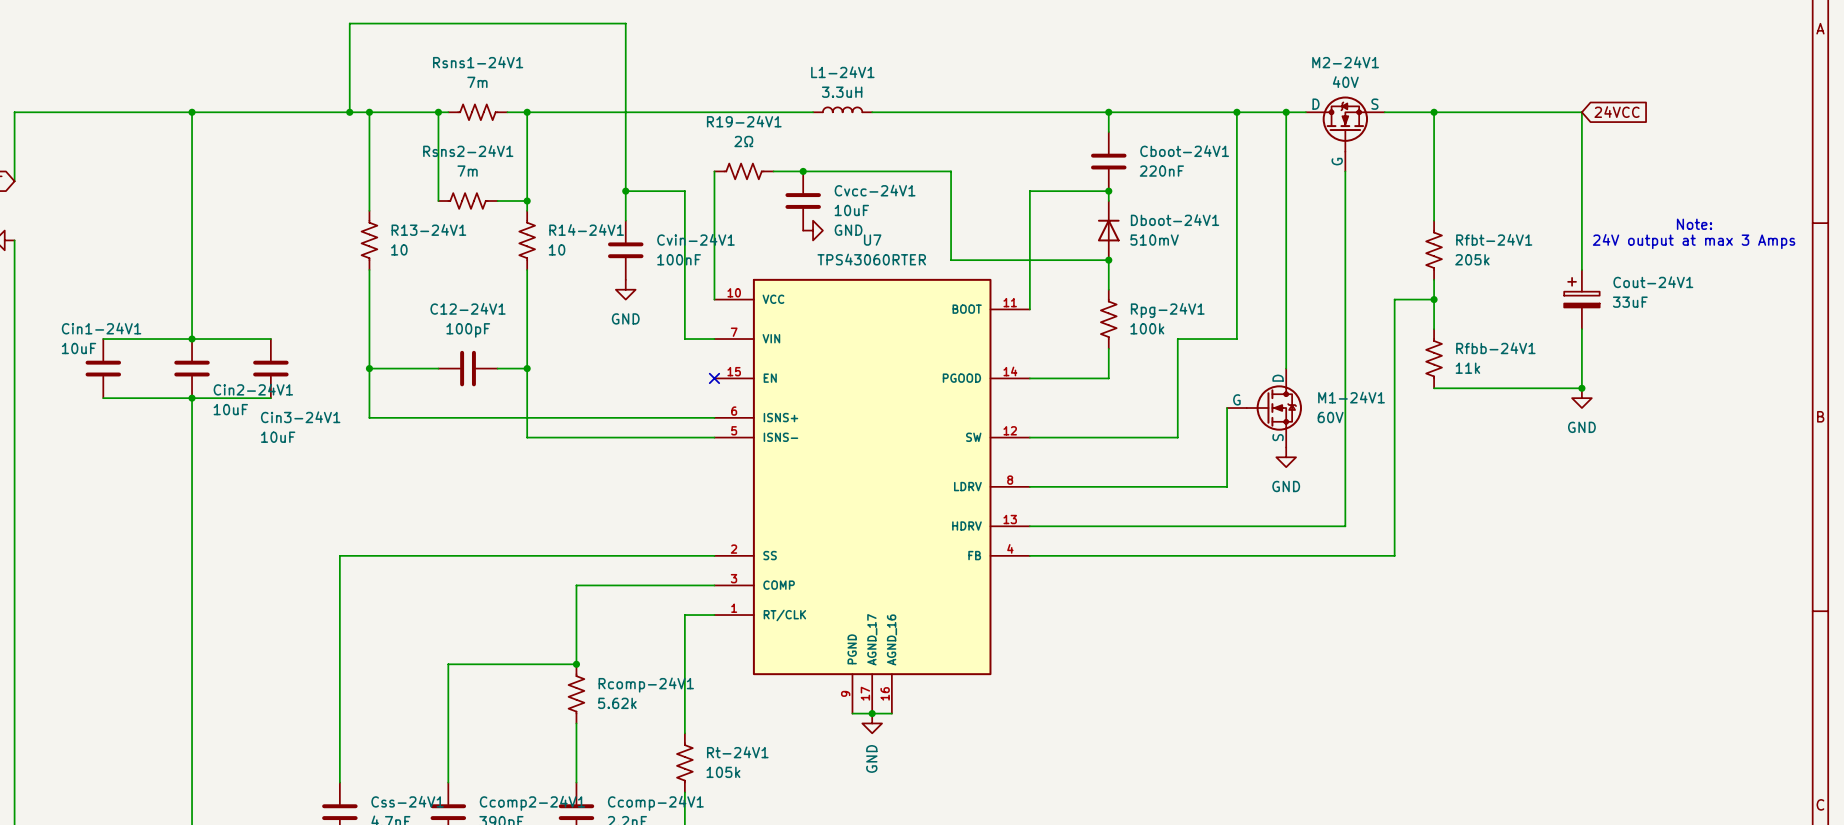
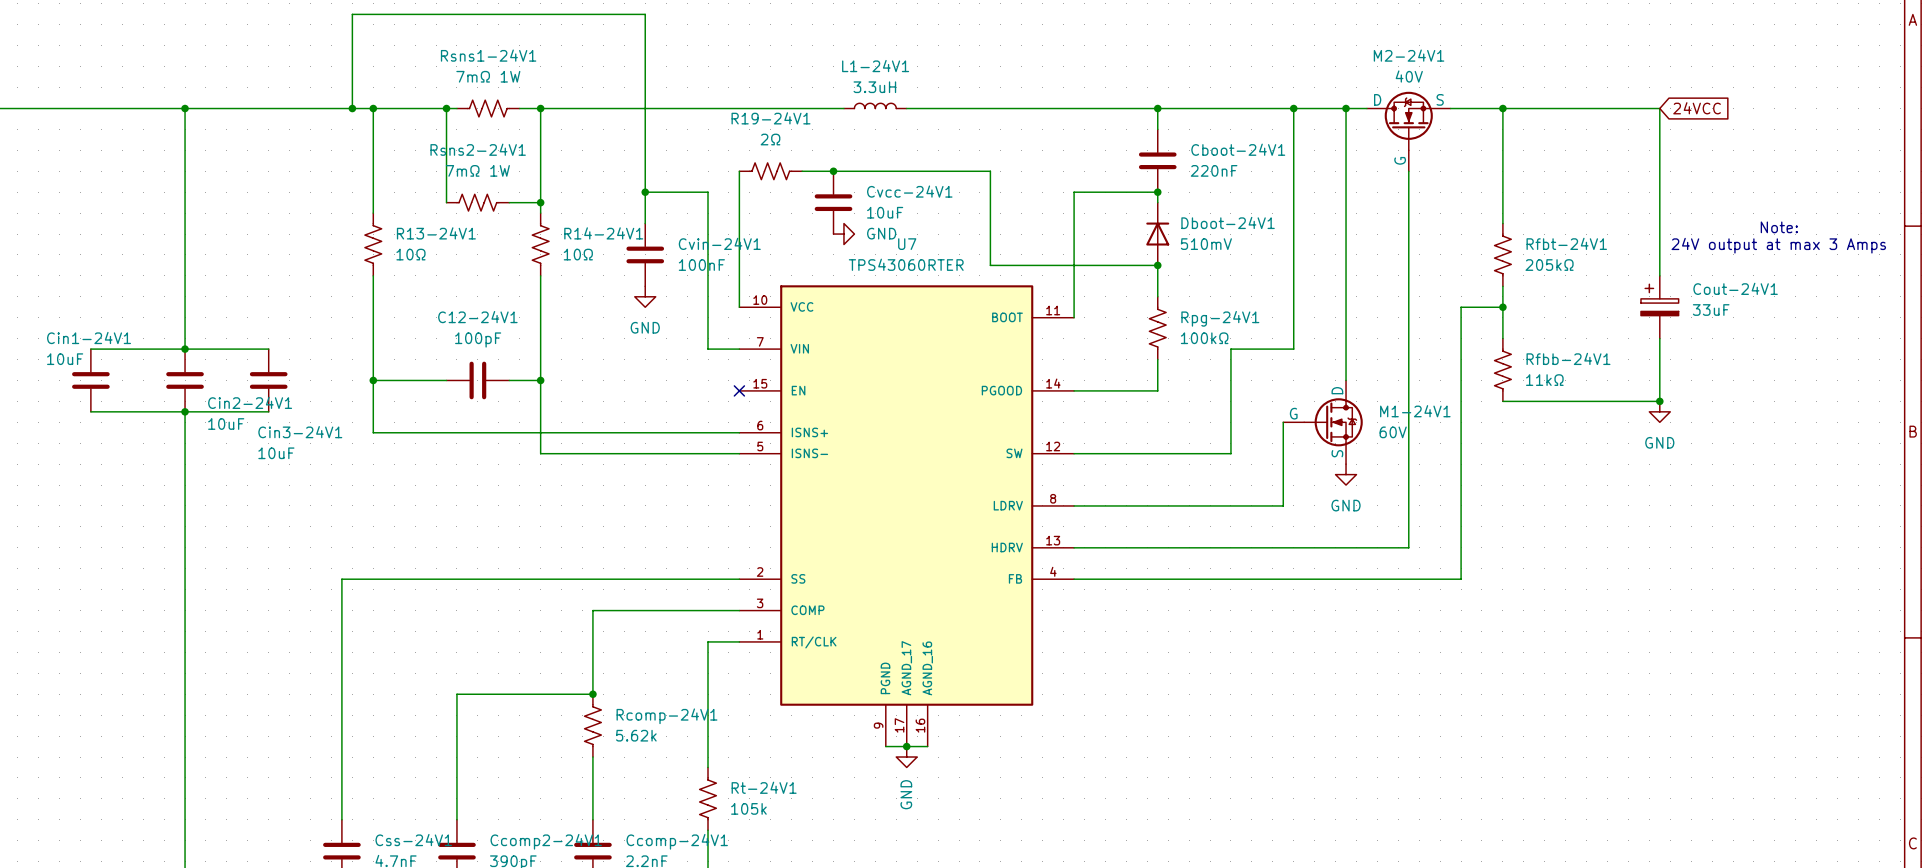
Rsns1-24V1 value: 7m (477, 82) -> 7mΩ 1W (488, 76)
Rsns2-24V1 value: 7m (467, 171) -> 7mΩ 1W (477, 170)
R13-24V1 value: 10 (399, 249) -> 10Ω (410, 254)
R14-24V1 value: 10 (557, 249) -> 10Ω (578, 254)
Rfbt-24V1 value: 205k (1472, 259) -> 205kΩ (1549, 265)
Rpg-24V1 value: 100k (1147, 328) -> 100kΩ (1204, 338)
Rfbb-24V1 value: 11k (1467, 368) -> 11kΩ (1544, 380)

